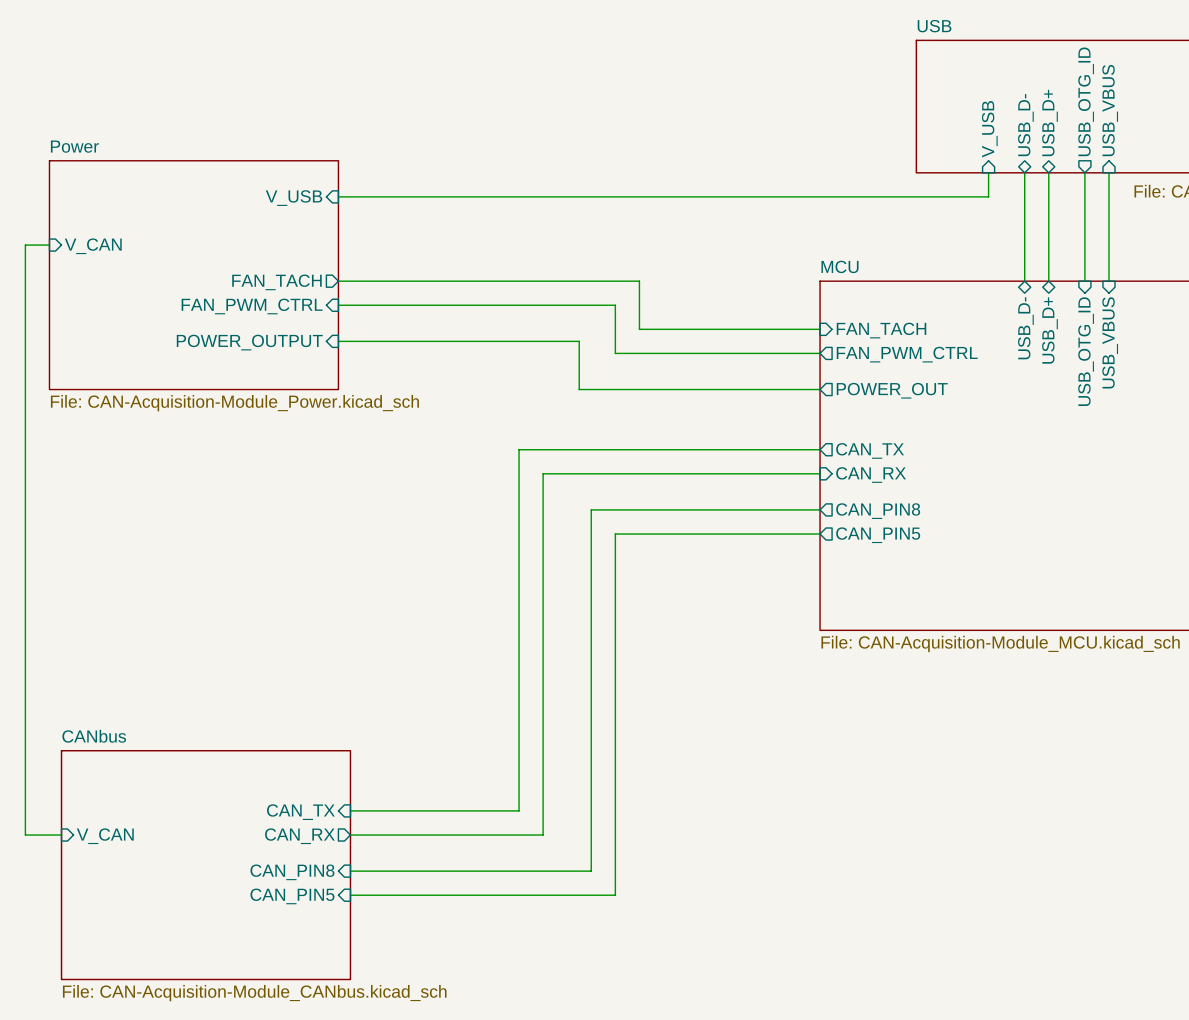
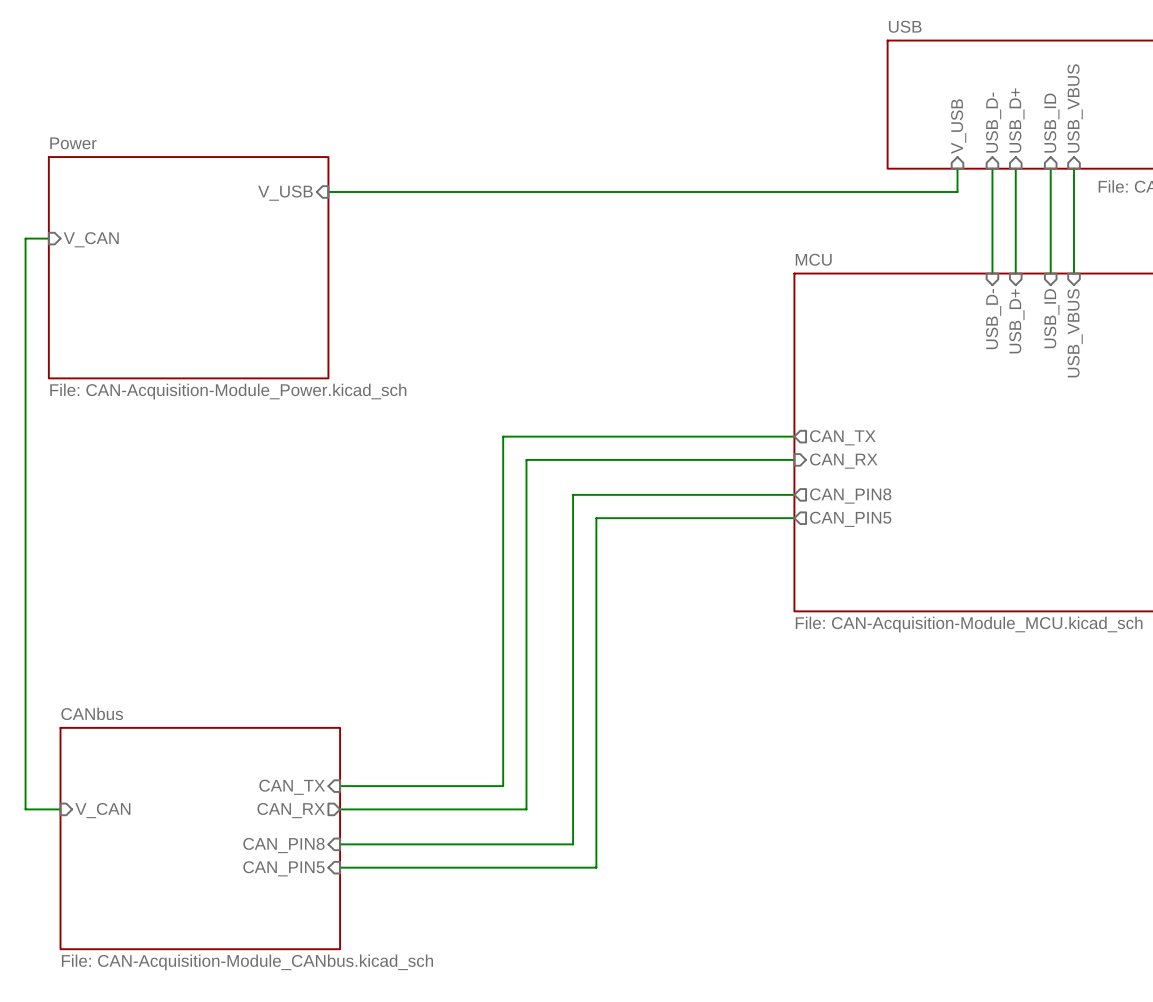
sheet pin shape: output (1086, 101) -> input (1051, 123)
sheet pin: USB_OTG_ID (1086, 101) -> USB_ID (1051, 123)
sheet pin shape: bidirectional (1049, 122) -> input (1016, 120)
sheet pin shape: bidirectional (1025, 125) -> input (993, 122)
wire: (338, 281) (639, 281) (639, 329) (820, 329) -> none
sheet pin: FAN_TACH (276, 282) -> none
wire: (338, 305) (615, 305) (615, 353) (820, 353) -> none
sheet pin: FAN_PWM_CTRL (252, 306) -> none
sheet pin shape: bidirectional (1025, 328) -> input (993, 319)
sheet pin: FAN_TACH (881, 330) -> none
sheet pin shape: bidirectional (1049, 330) -> input (1016, 321)
wire: (338, 341) (579, 341) (579, 389) (820, 389) -> none
sheet pin: POWER_OUTPUT (249, 342) -> none
sheet pin: USB_OTG_ID (1086, 351) -> USB_ID (1051, 318)
sheet pin: FAN_PWM_CTRL (907, 354) -> none
sheet pin: POWER_OUT (892, 390) -> none

